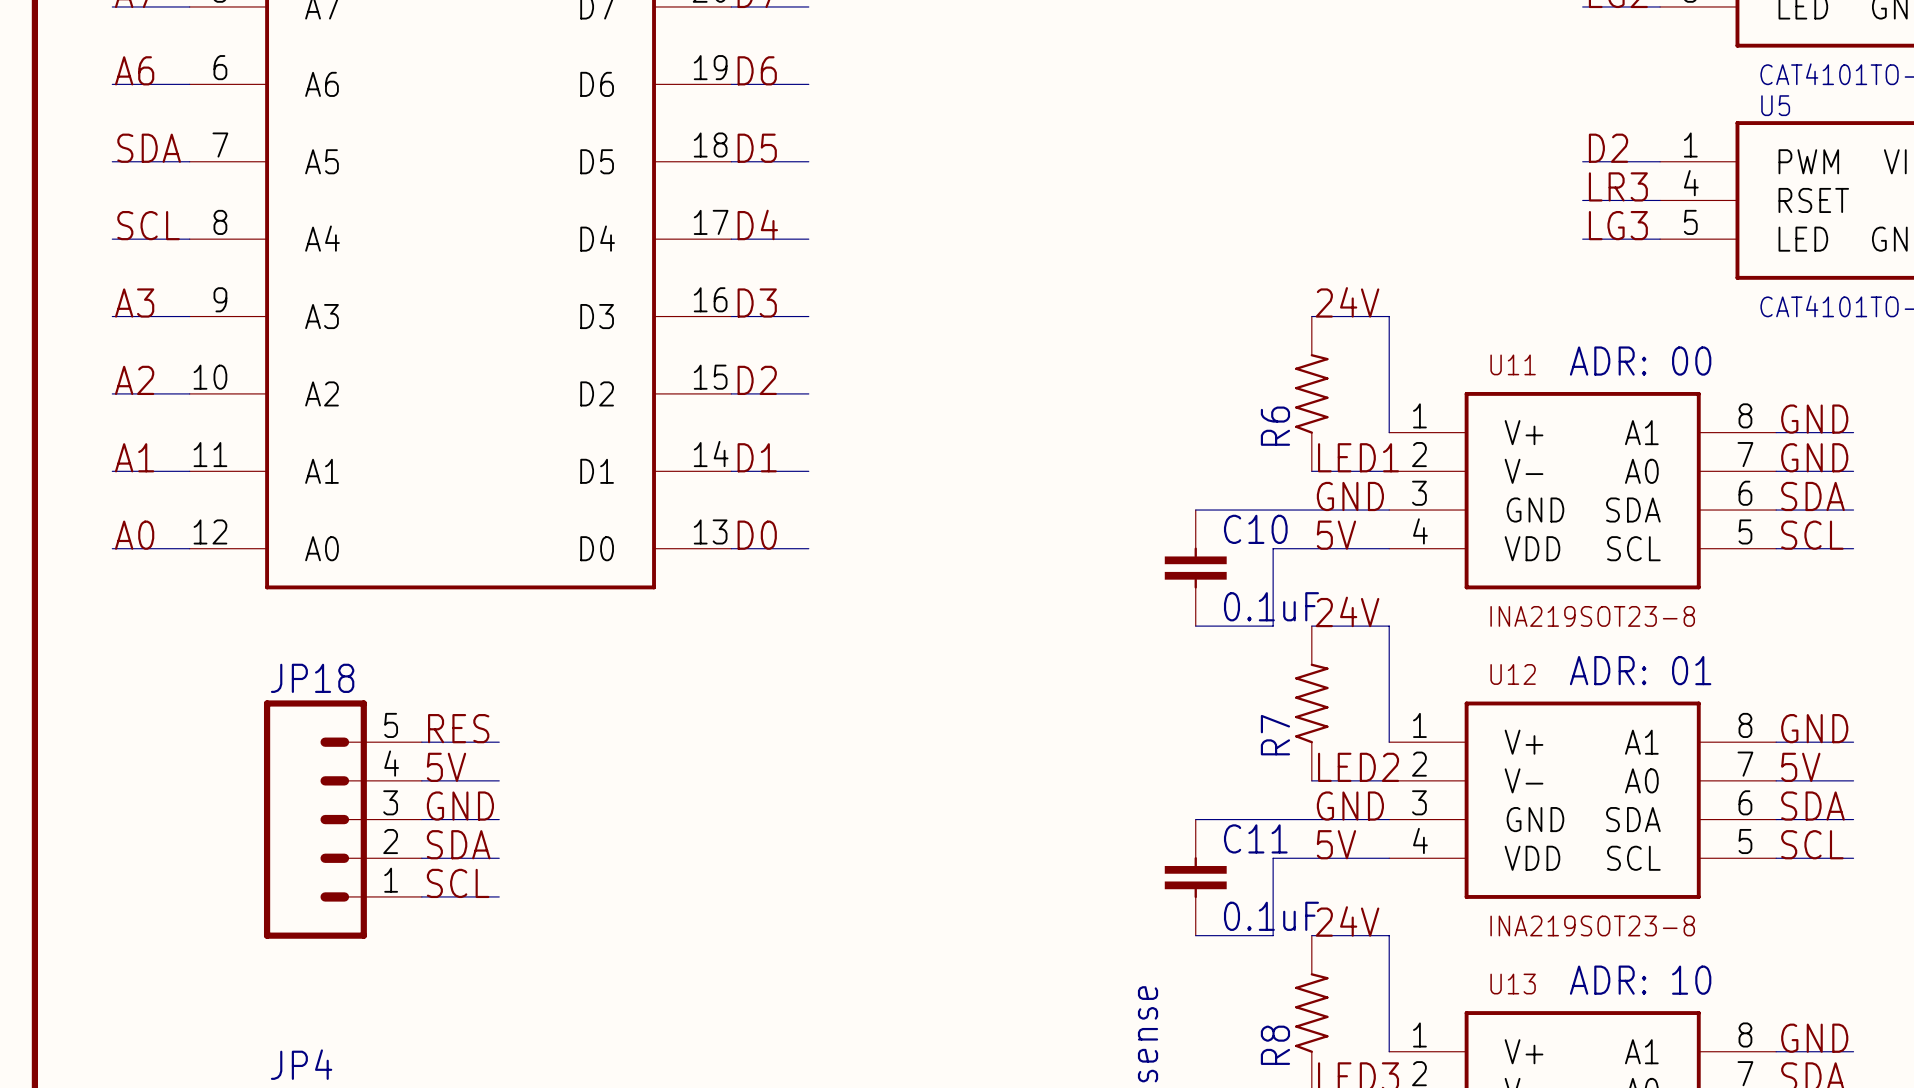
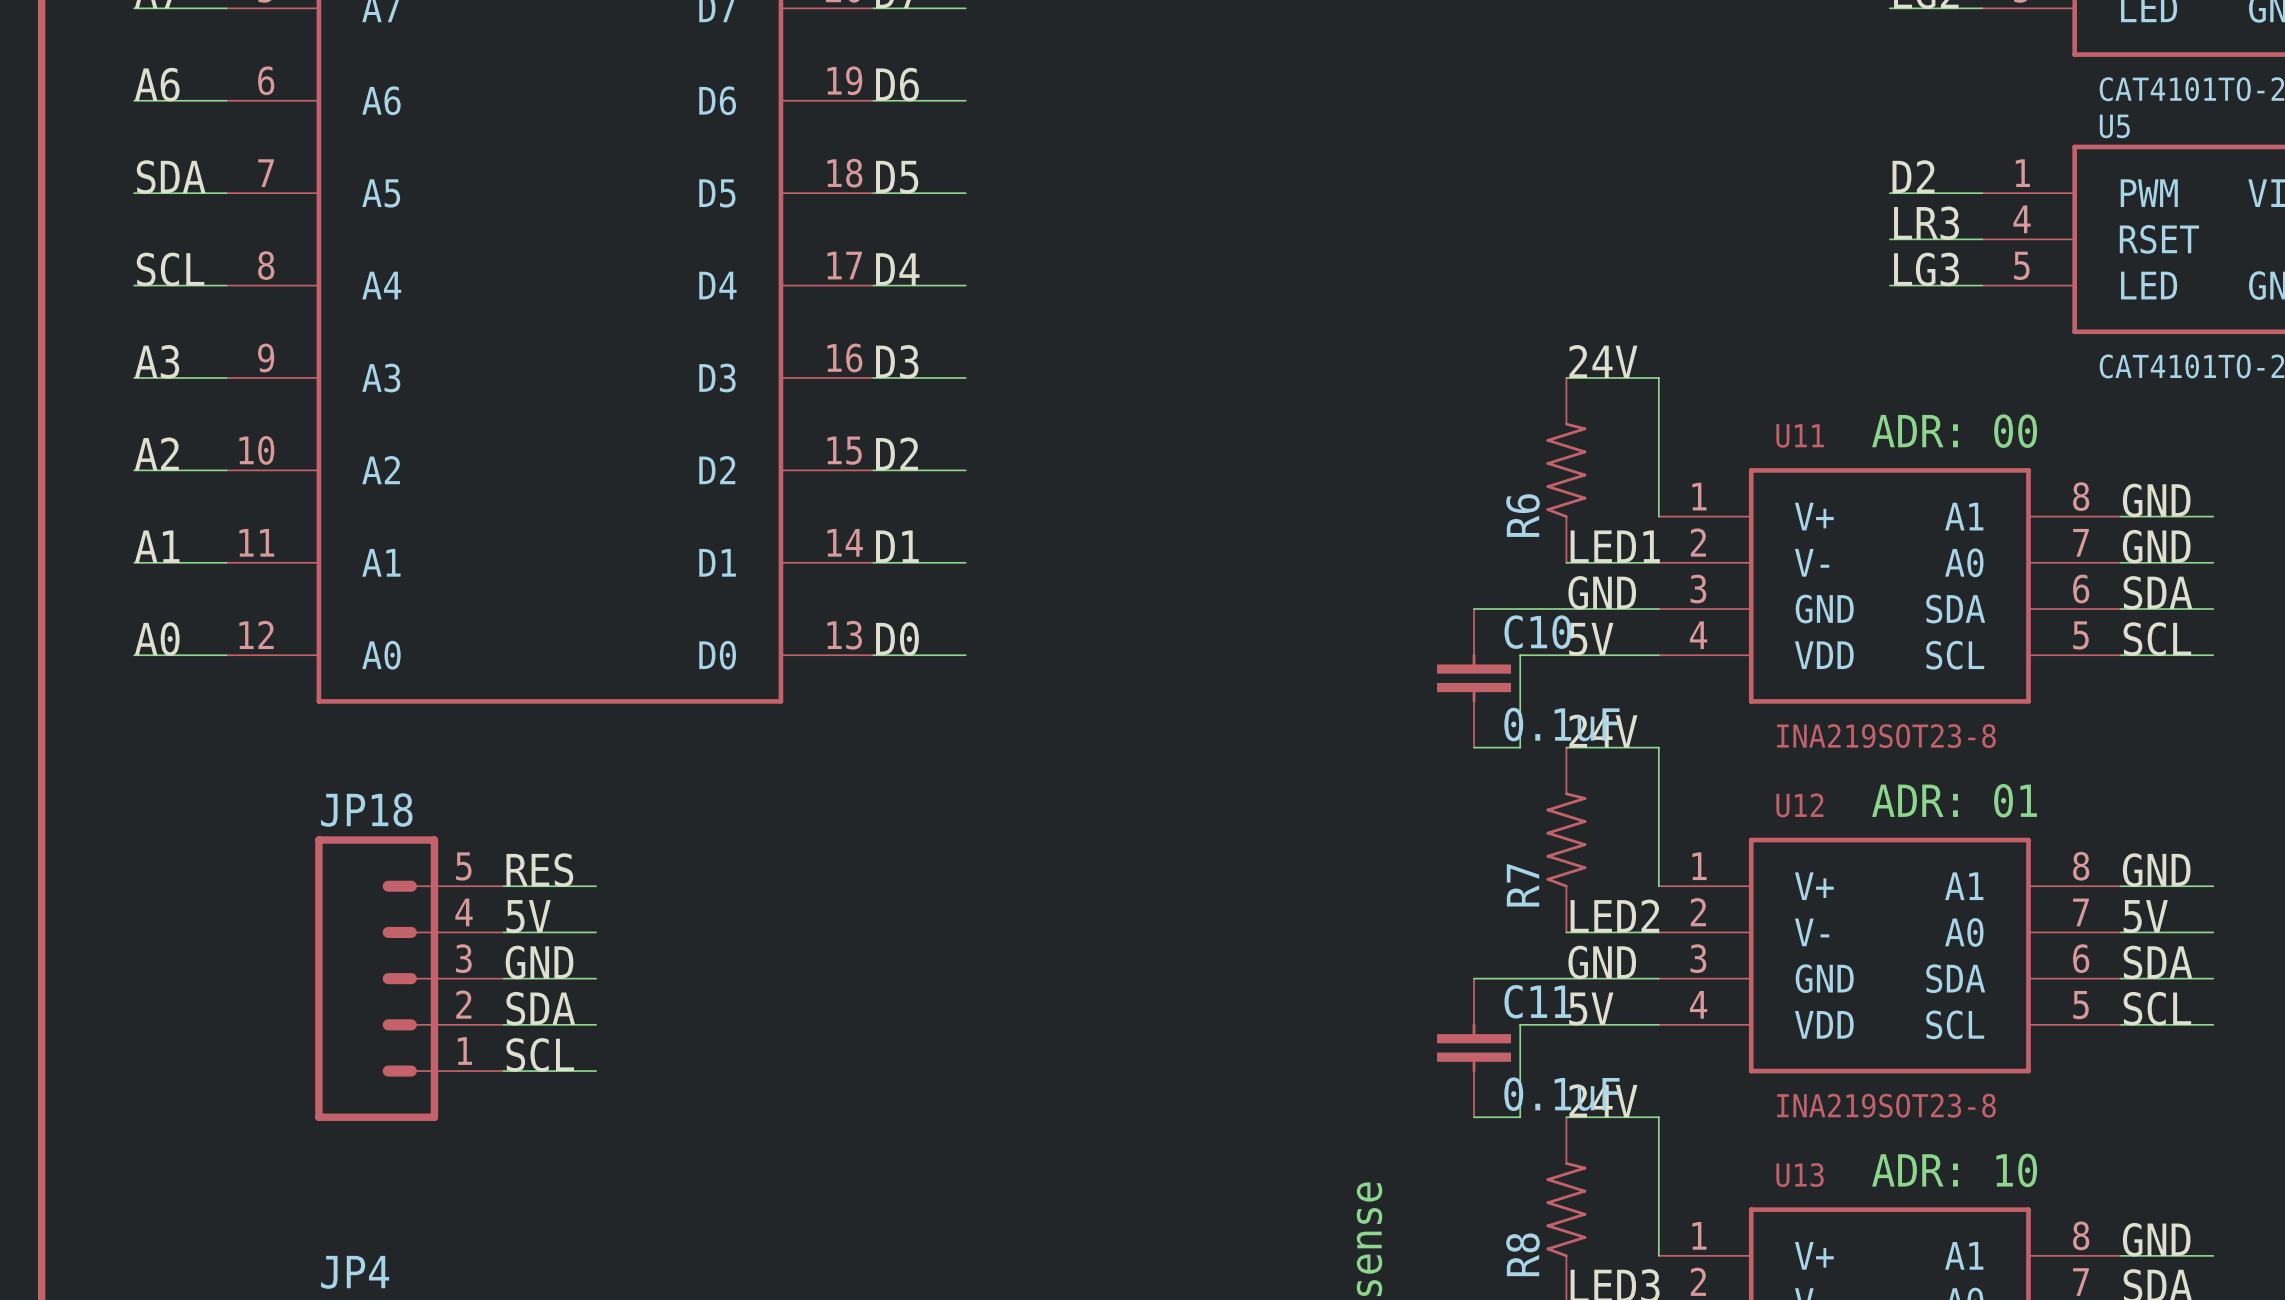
wire: (1195, 510) (1234, 510) -> none
C10 position: (1195, 568) -> (1474, 678)
wire: (1195, 626) (1234, 626) -> none
wire: (1195, 819) (1234, 819) -> none
C11 position: (1195, 877) -> (1474, 1047)
wire: (1195, 935) (1234, 935) -> none

